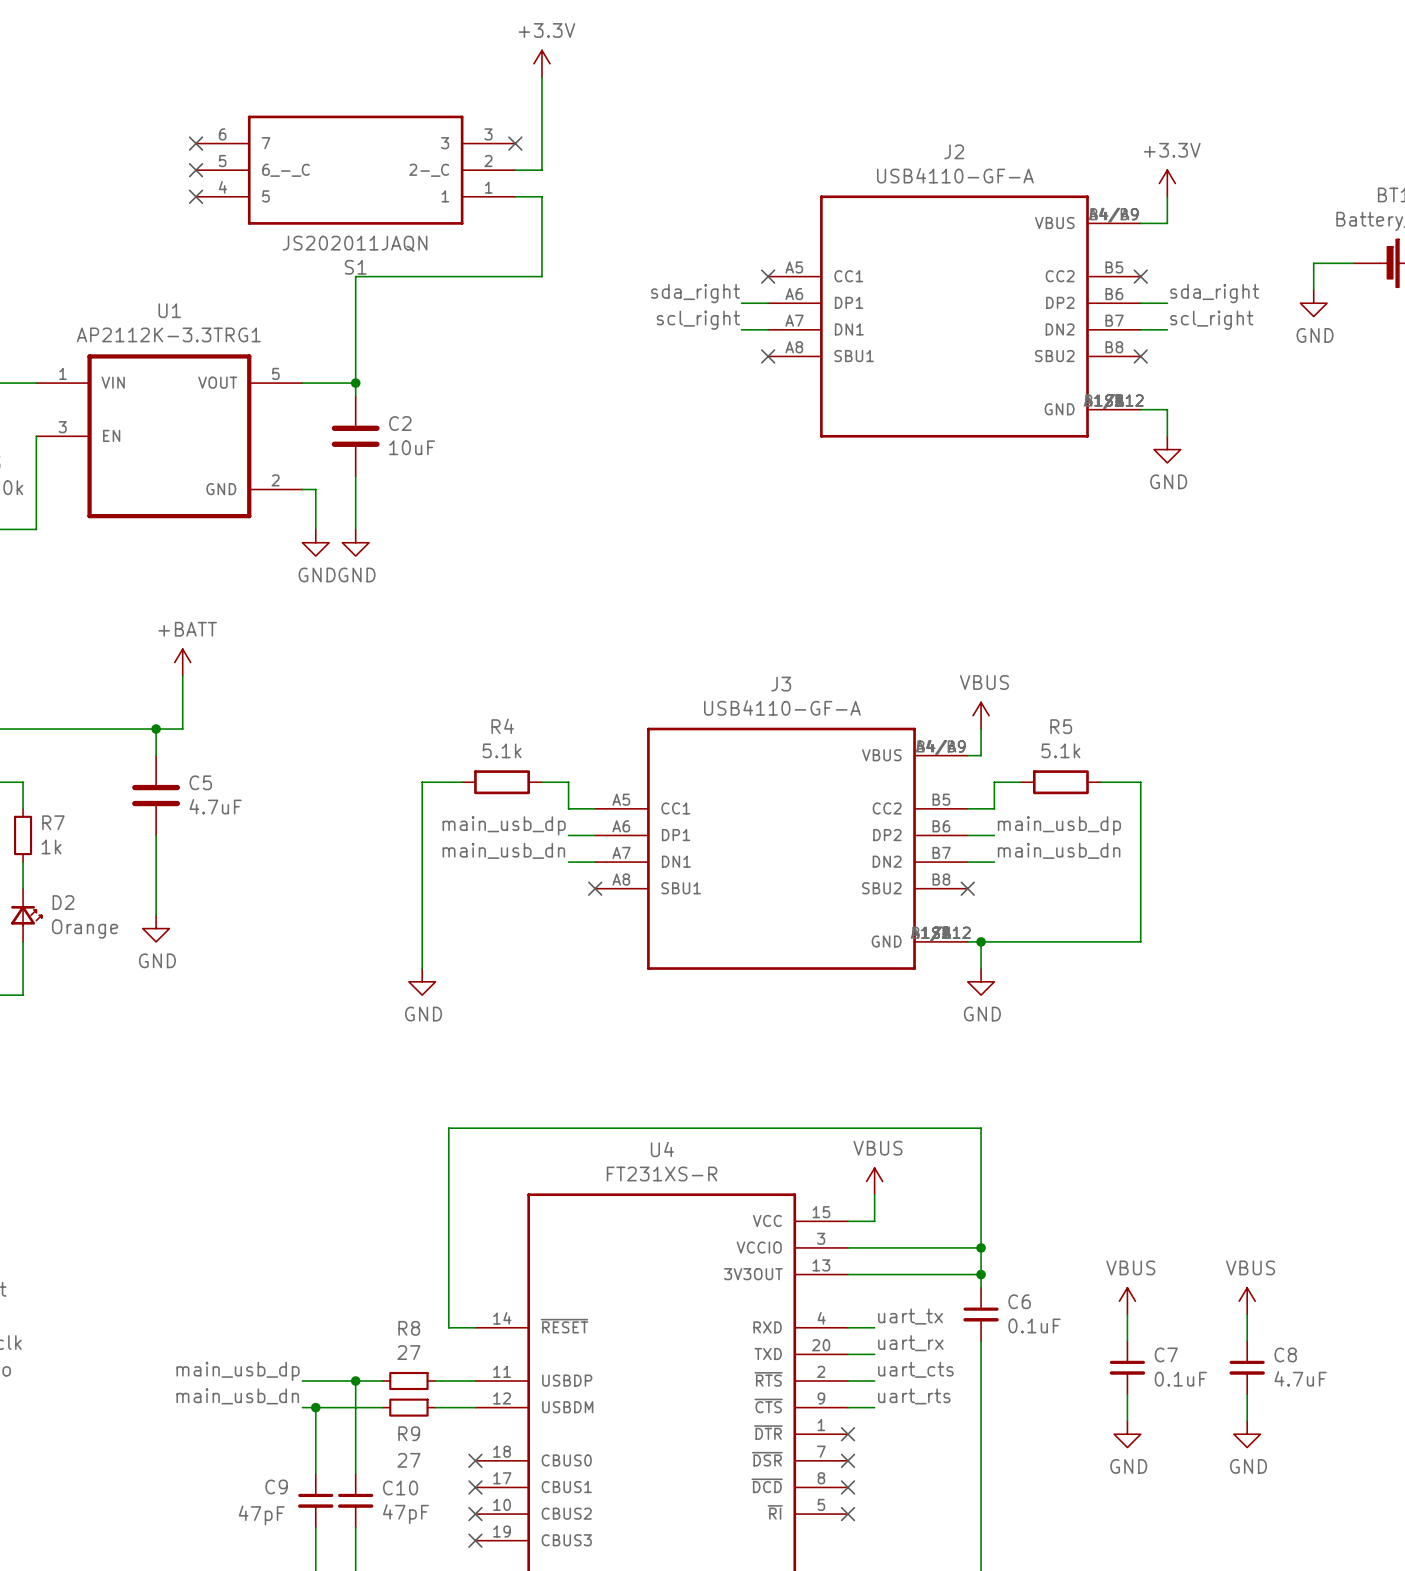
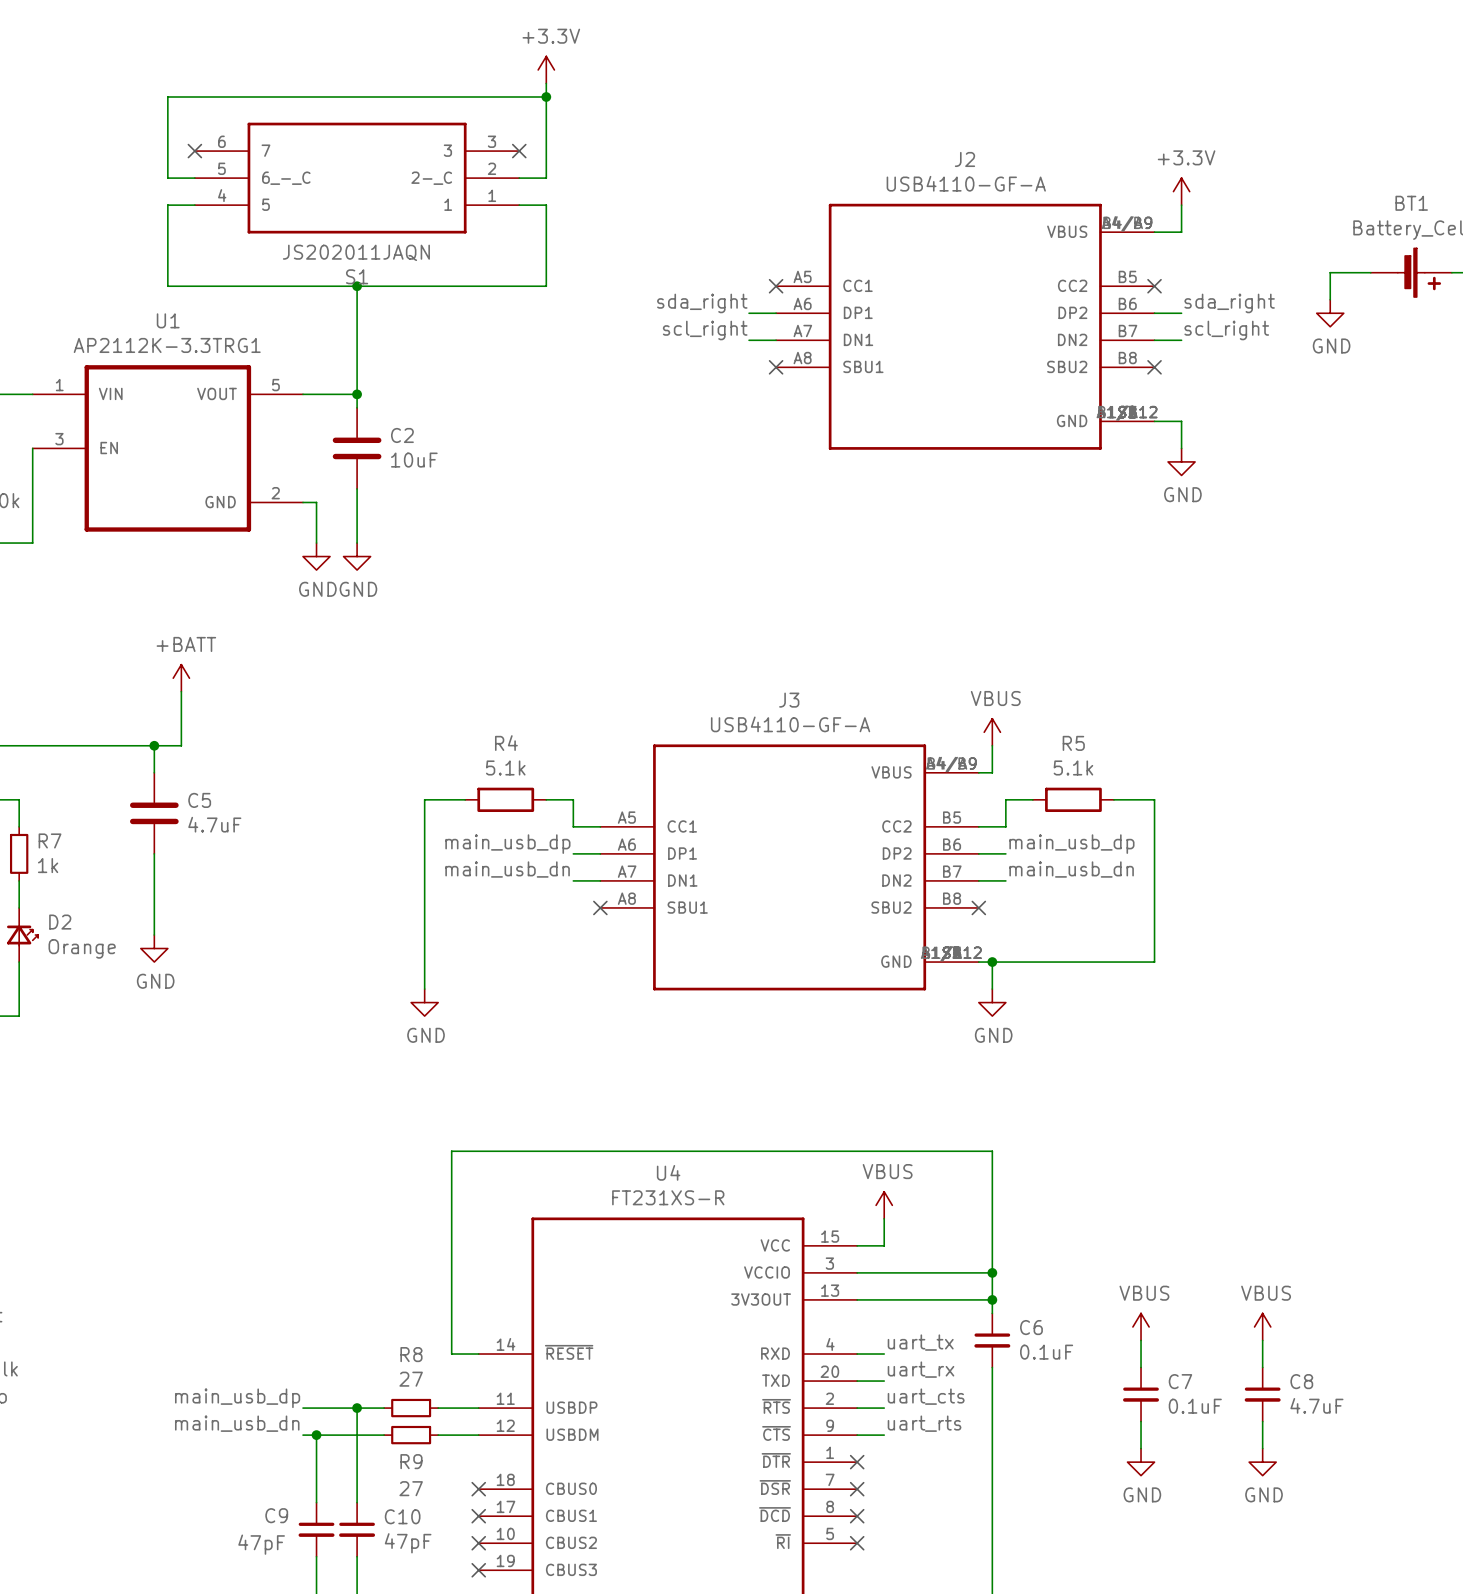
wire: none -> (546, 97) (167, 97) (167, 178) (194, 178)
junction: none -> (546, 97)
no-connect mark: (196, 170) -> none
wire: none -> (194, 205) (167, 205) (167, 286) (357, 286)
no-connect mark: (196, 196) -> none
junction: none -> (357, 286)

